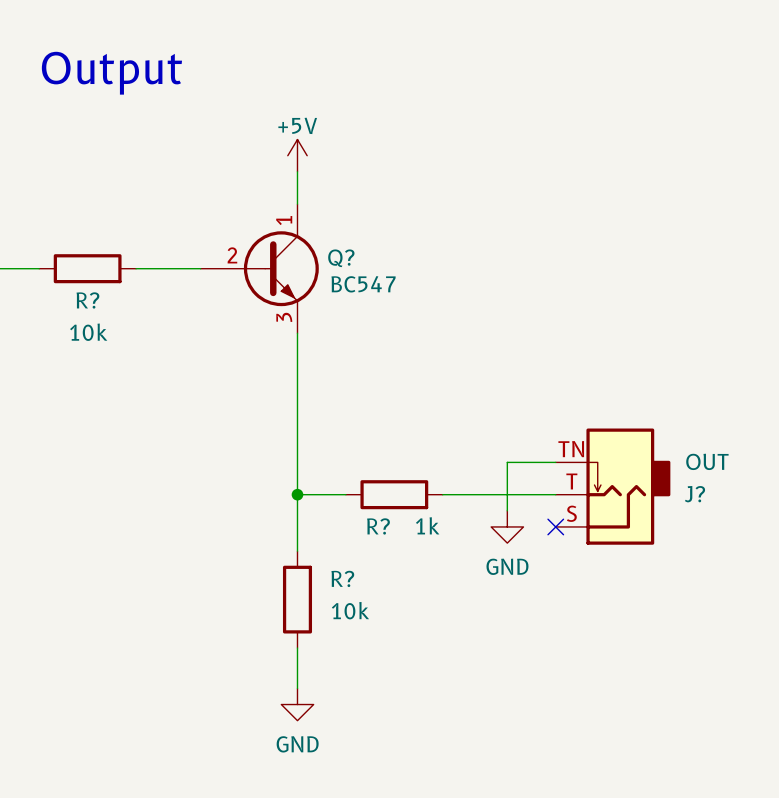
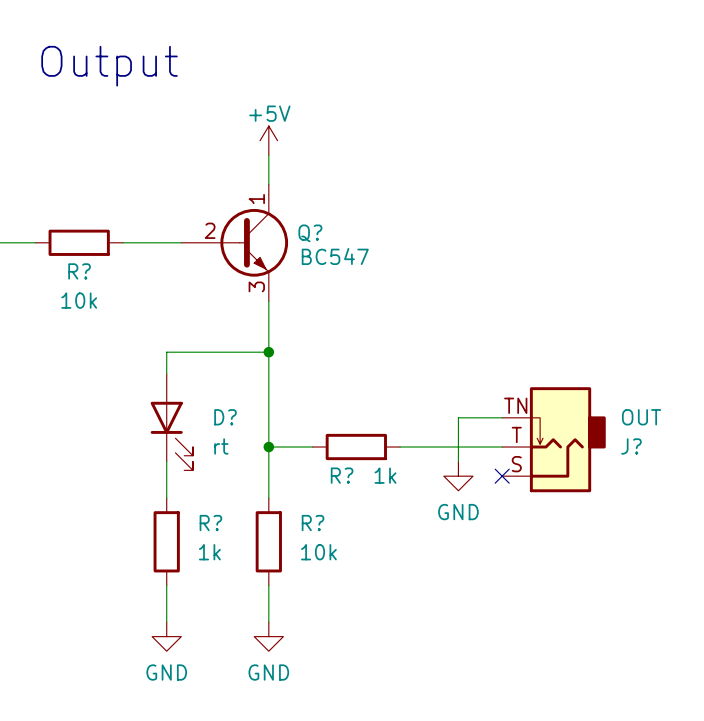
wire: none -> (268, 352) (166, 352) (166, 374)
junction: none -> (268, 352)
D?: none -> rt (171, 422)
wire: none -> (166, 461) (166, 498)
R?: none -> 1k (166, 541)
wire: none -> (166, 585) (166, 622)
power symbol: none -> GND (166, 636)

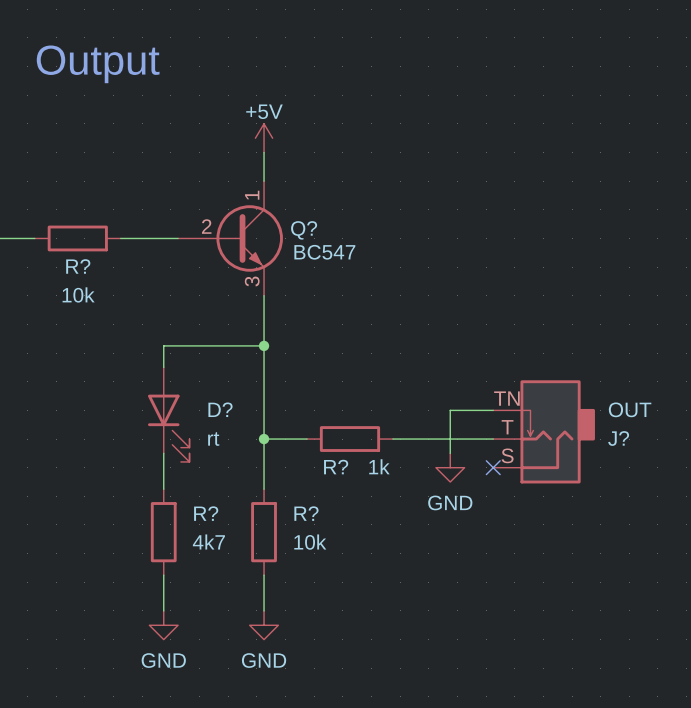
R? value: 1k (209, 552) -> 4k7 (208, 541)

